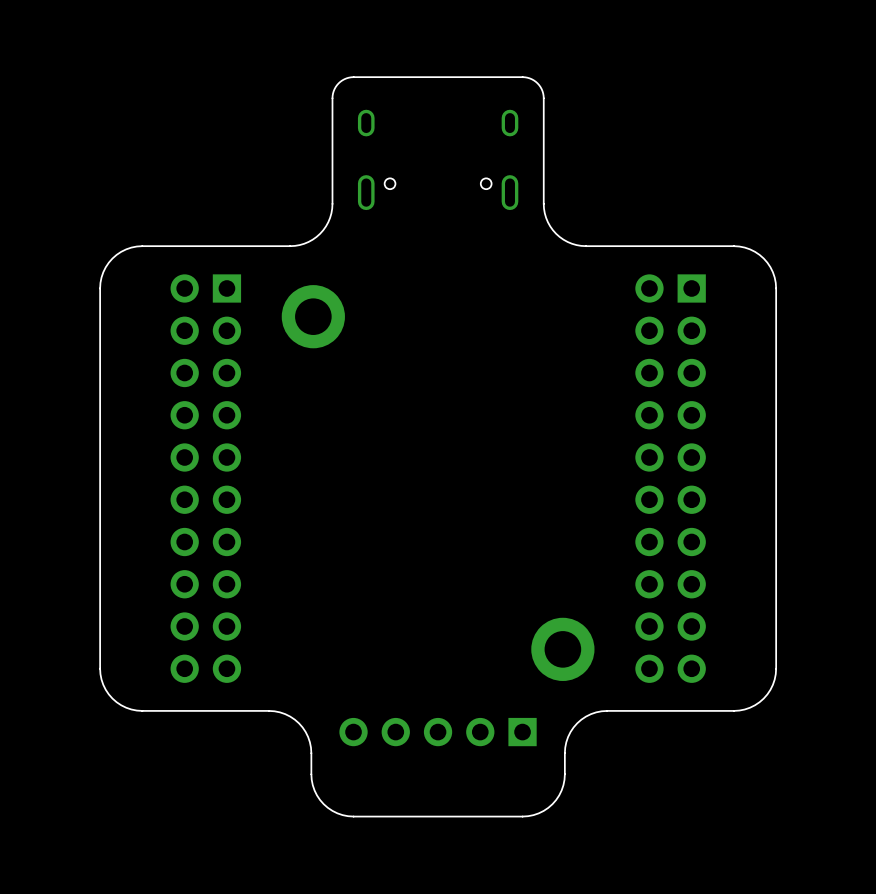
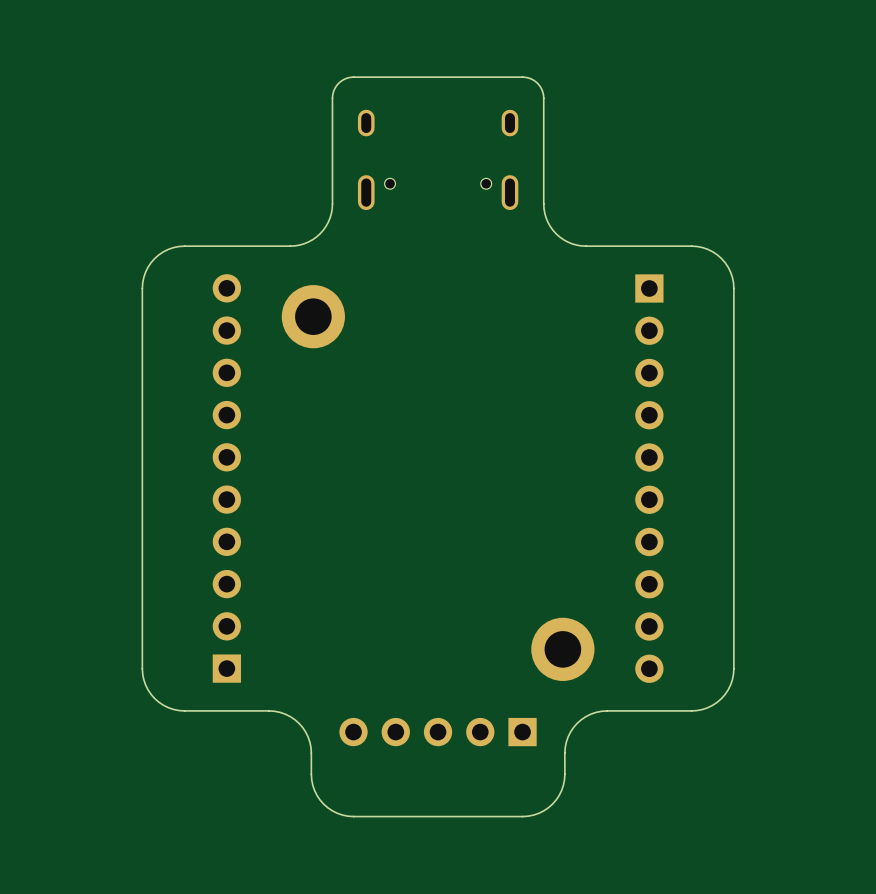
board edge: (184, 246) (136, 246) (121, 251) (105, 267) (100, 288) (101, 679) (112, 698) (126, 707) (142, 710) (184, 710) -> (184, 246) (168, 249) (154, 258) (145, 272) (142, 288) (142, 674) (148, 689) (158, 702) (173, 709) (184, 710)
board edge: (691, 246) (739, 246) (755, 251) (770, 267) (776, 288) (774, 679) (767, 694) (750, 707) (733, 710) (691, 710) -> (691, 246) (707, 249) (721, 258) (730, 272) (733, 288) (733, 674) (730, 684) (721, 698) (707, 707) (691, 710)
part: (205, 478) -> none
part: none -> (226, 478)
part: none -> (649, 478)
part: (670, 478) -> none

